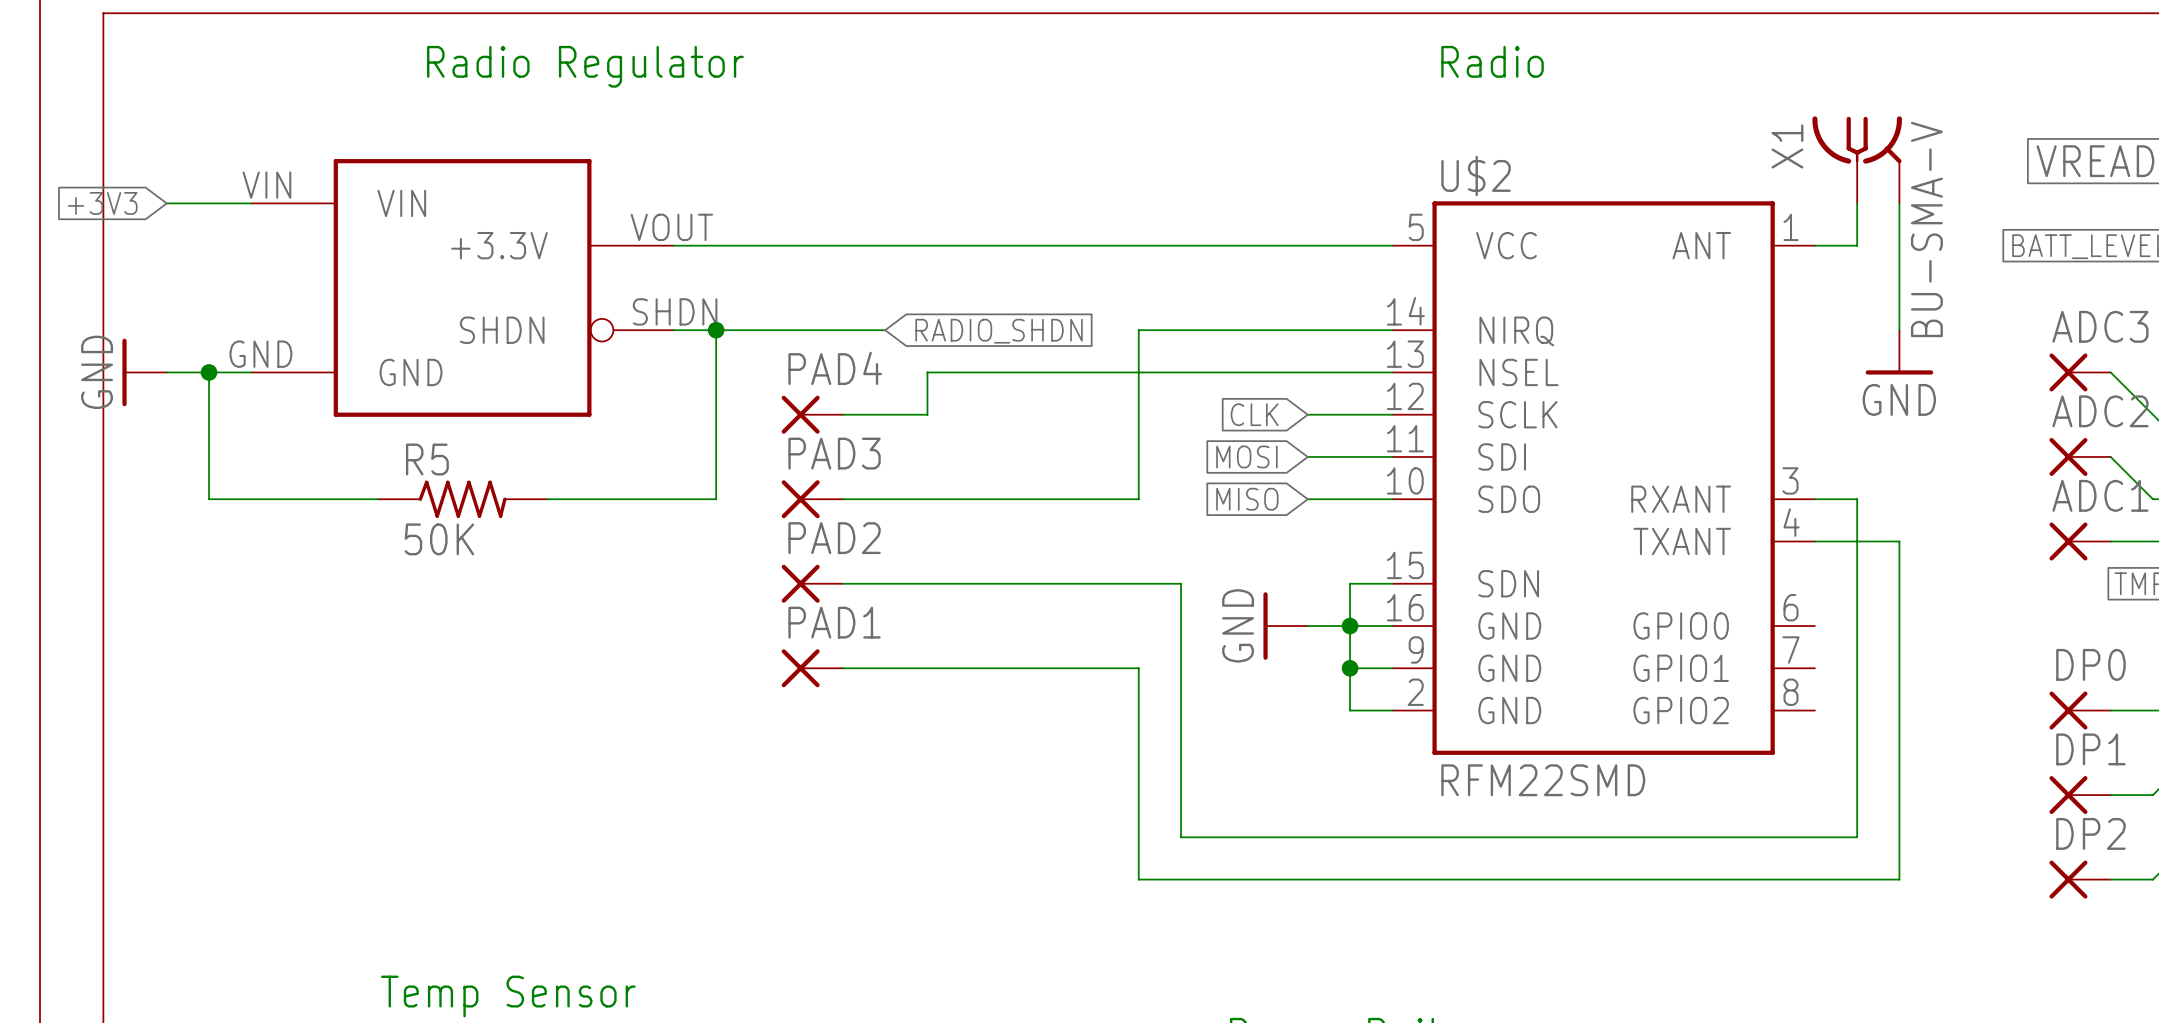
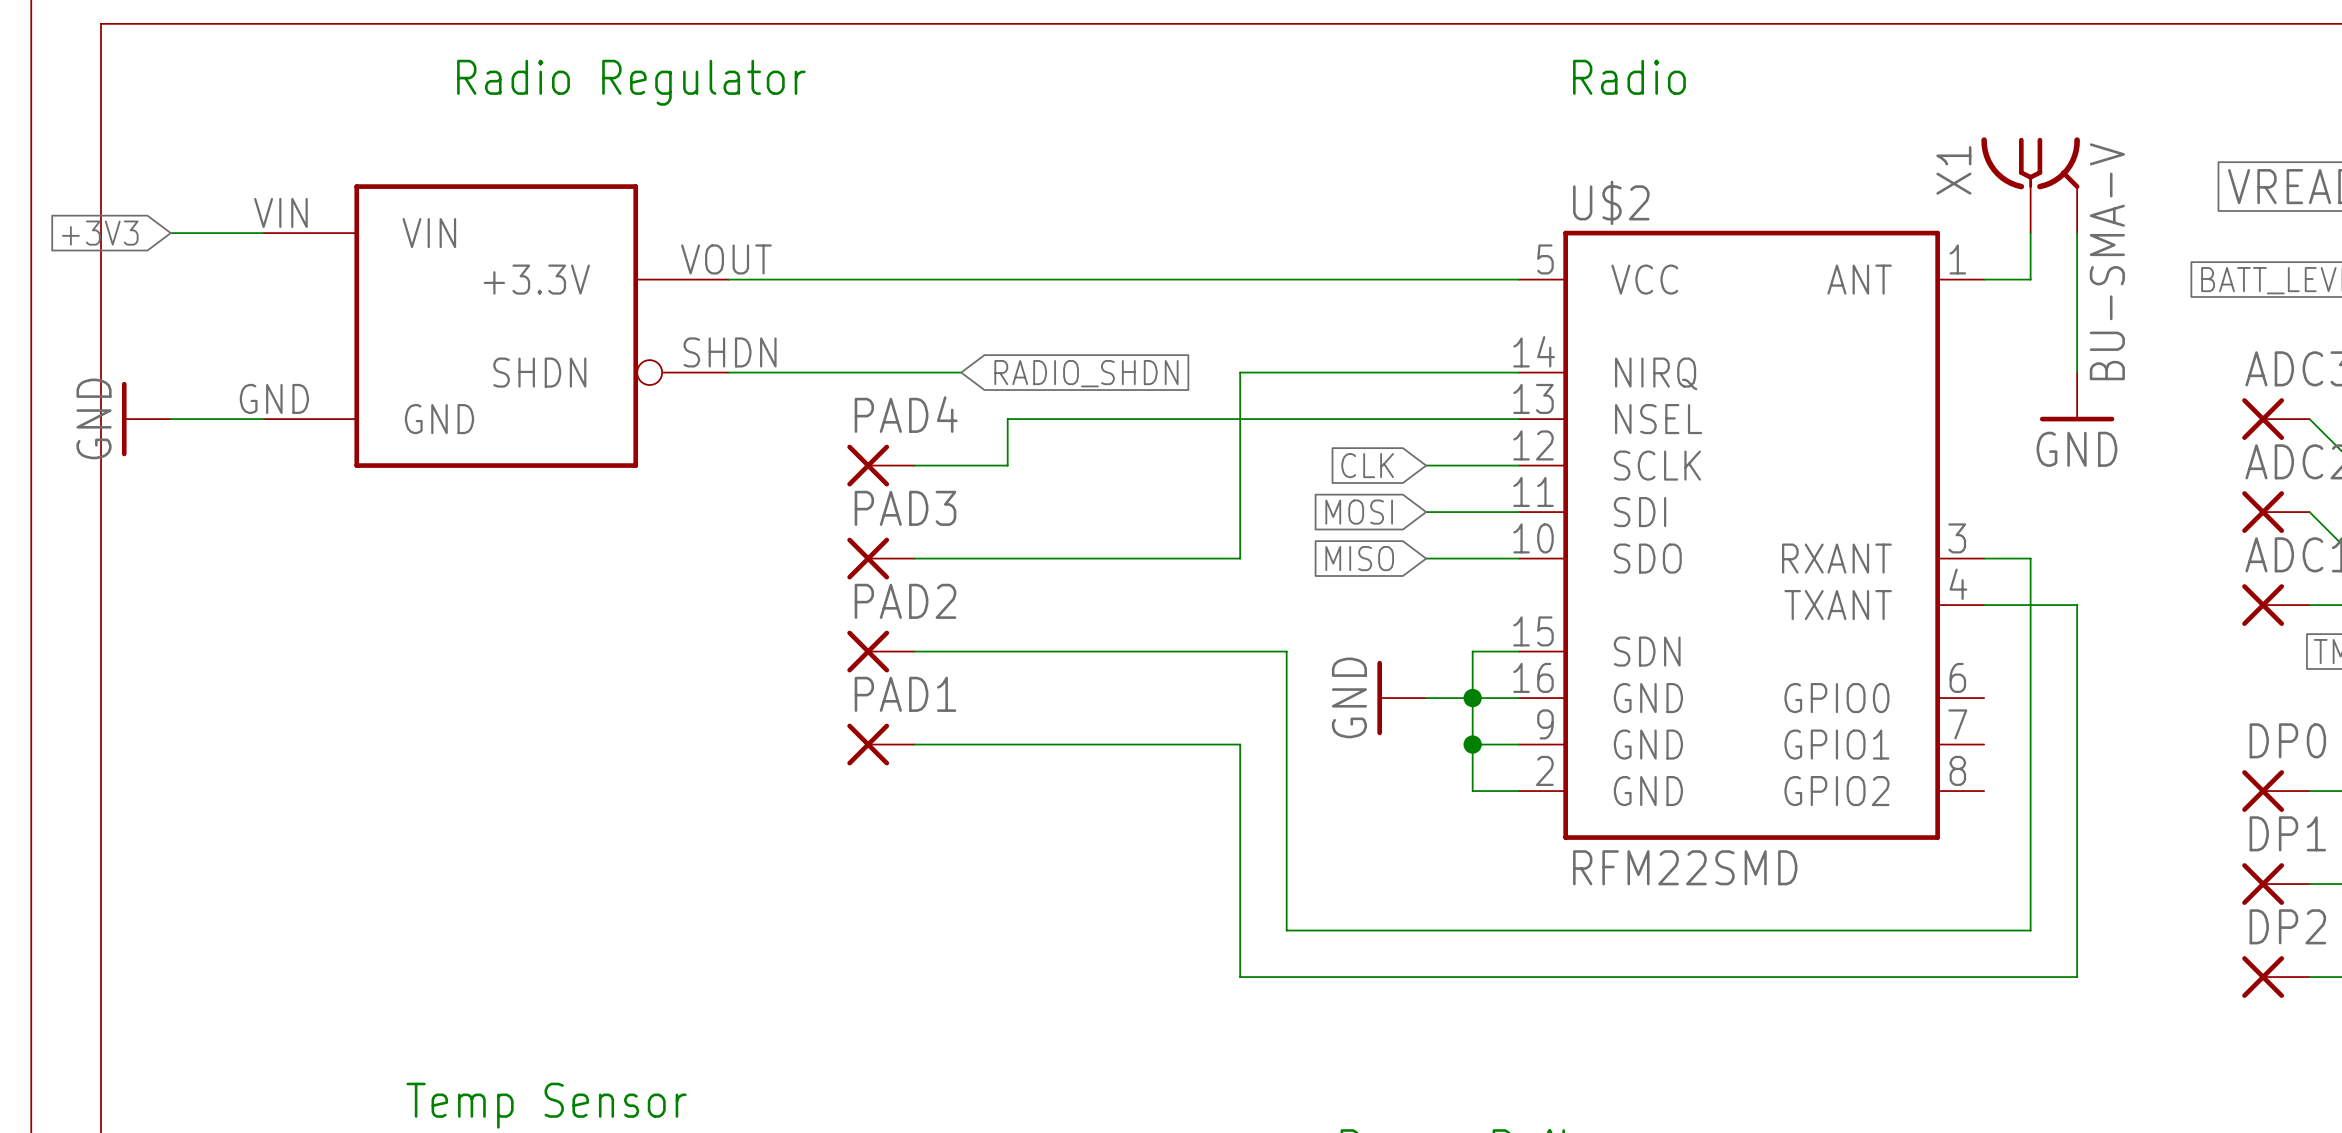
wire: (716, 330) (716, 499) (547, 499) -> none
junction: (716, 330) -> none
wire: (209, 372) (209, 499) (378, 499) -> none
junction: (209, 372) -> none
R5: 50K (462, 499) -> none

